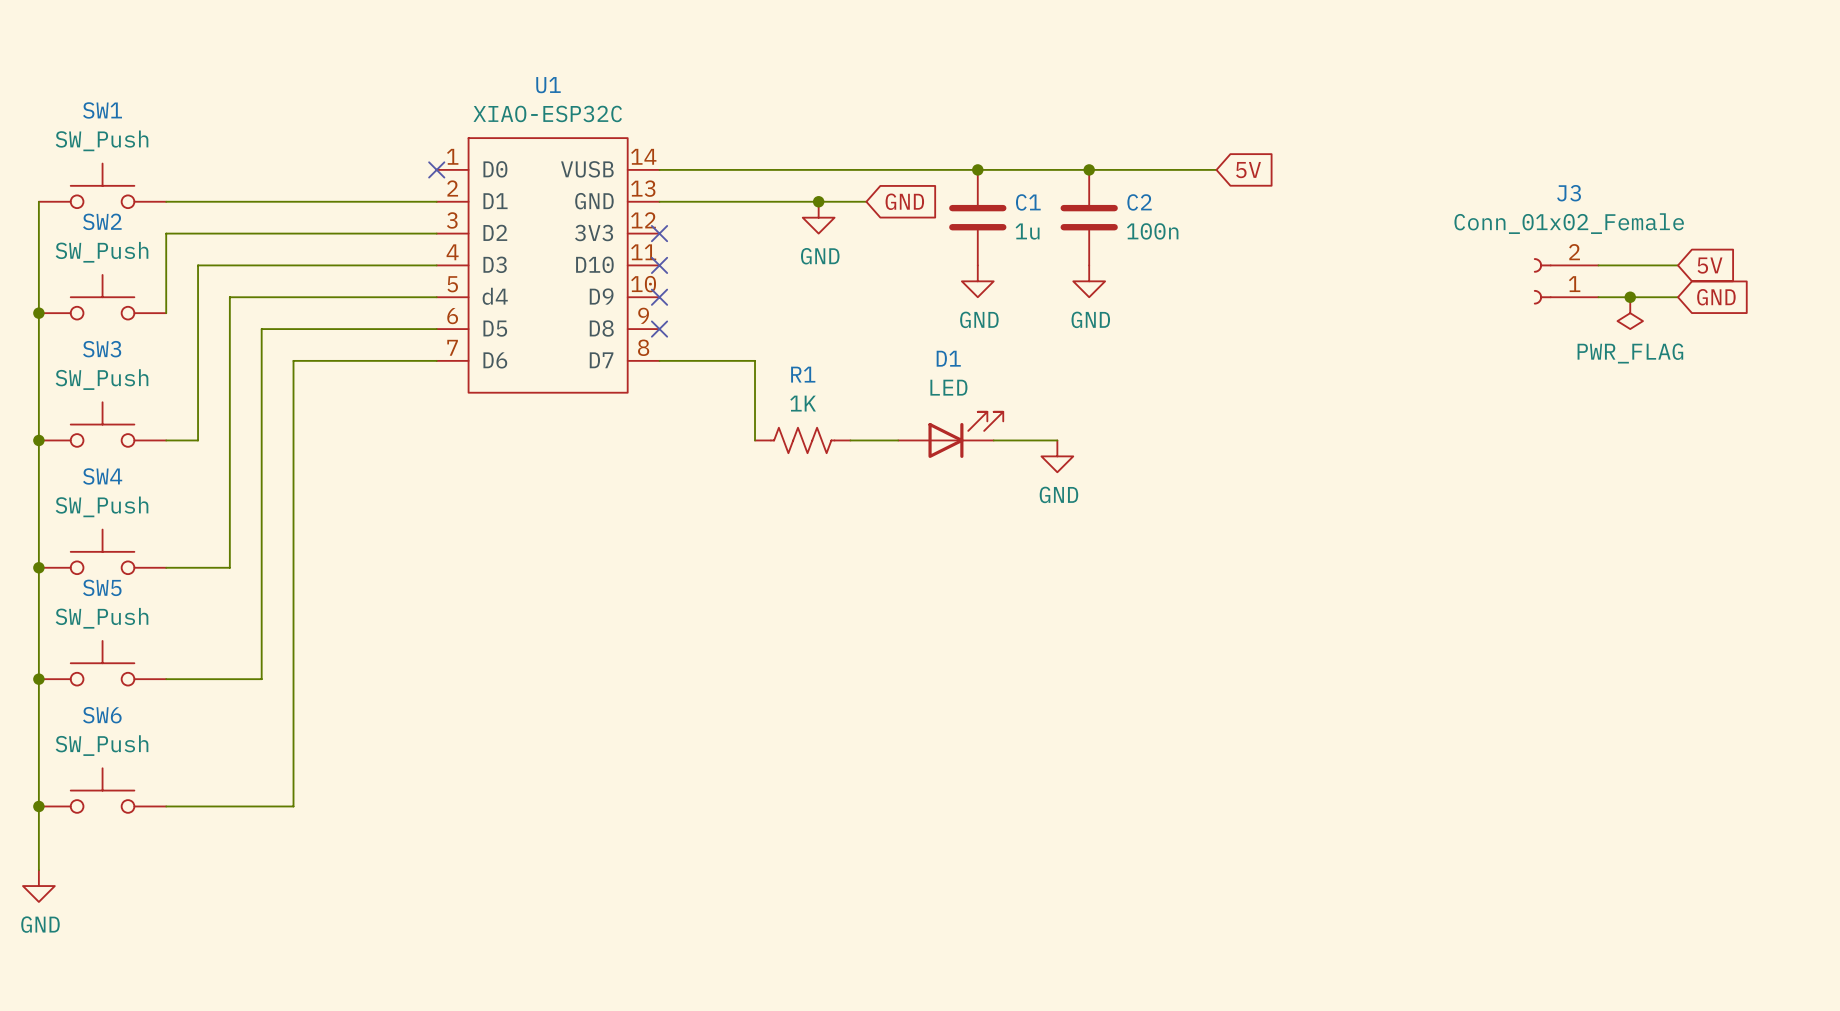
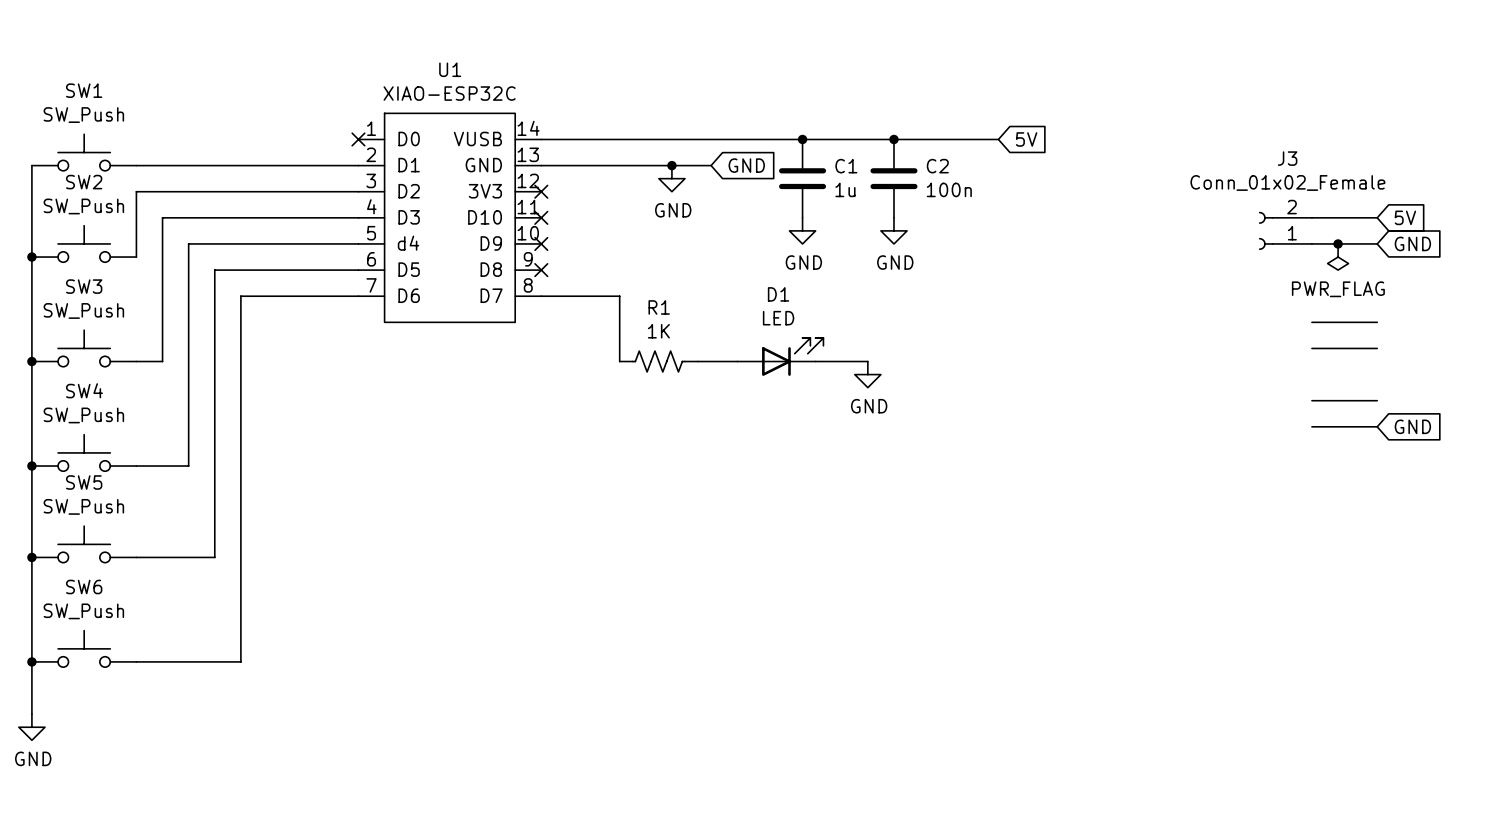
wire: none -> (1311, 322) (1377, 322)
wire: none -> (1311, 348) (1377, 348)
wire: none -> (1311, 400) (1377, 400)
wire: none -> (1311, 426) (1377, 426)
global label: none -> GND (1412, 426)

